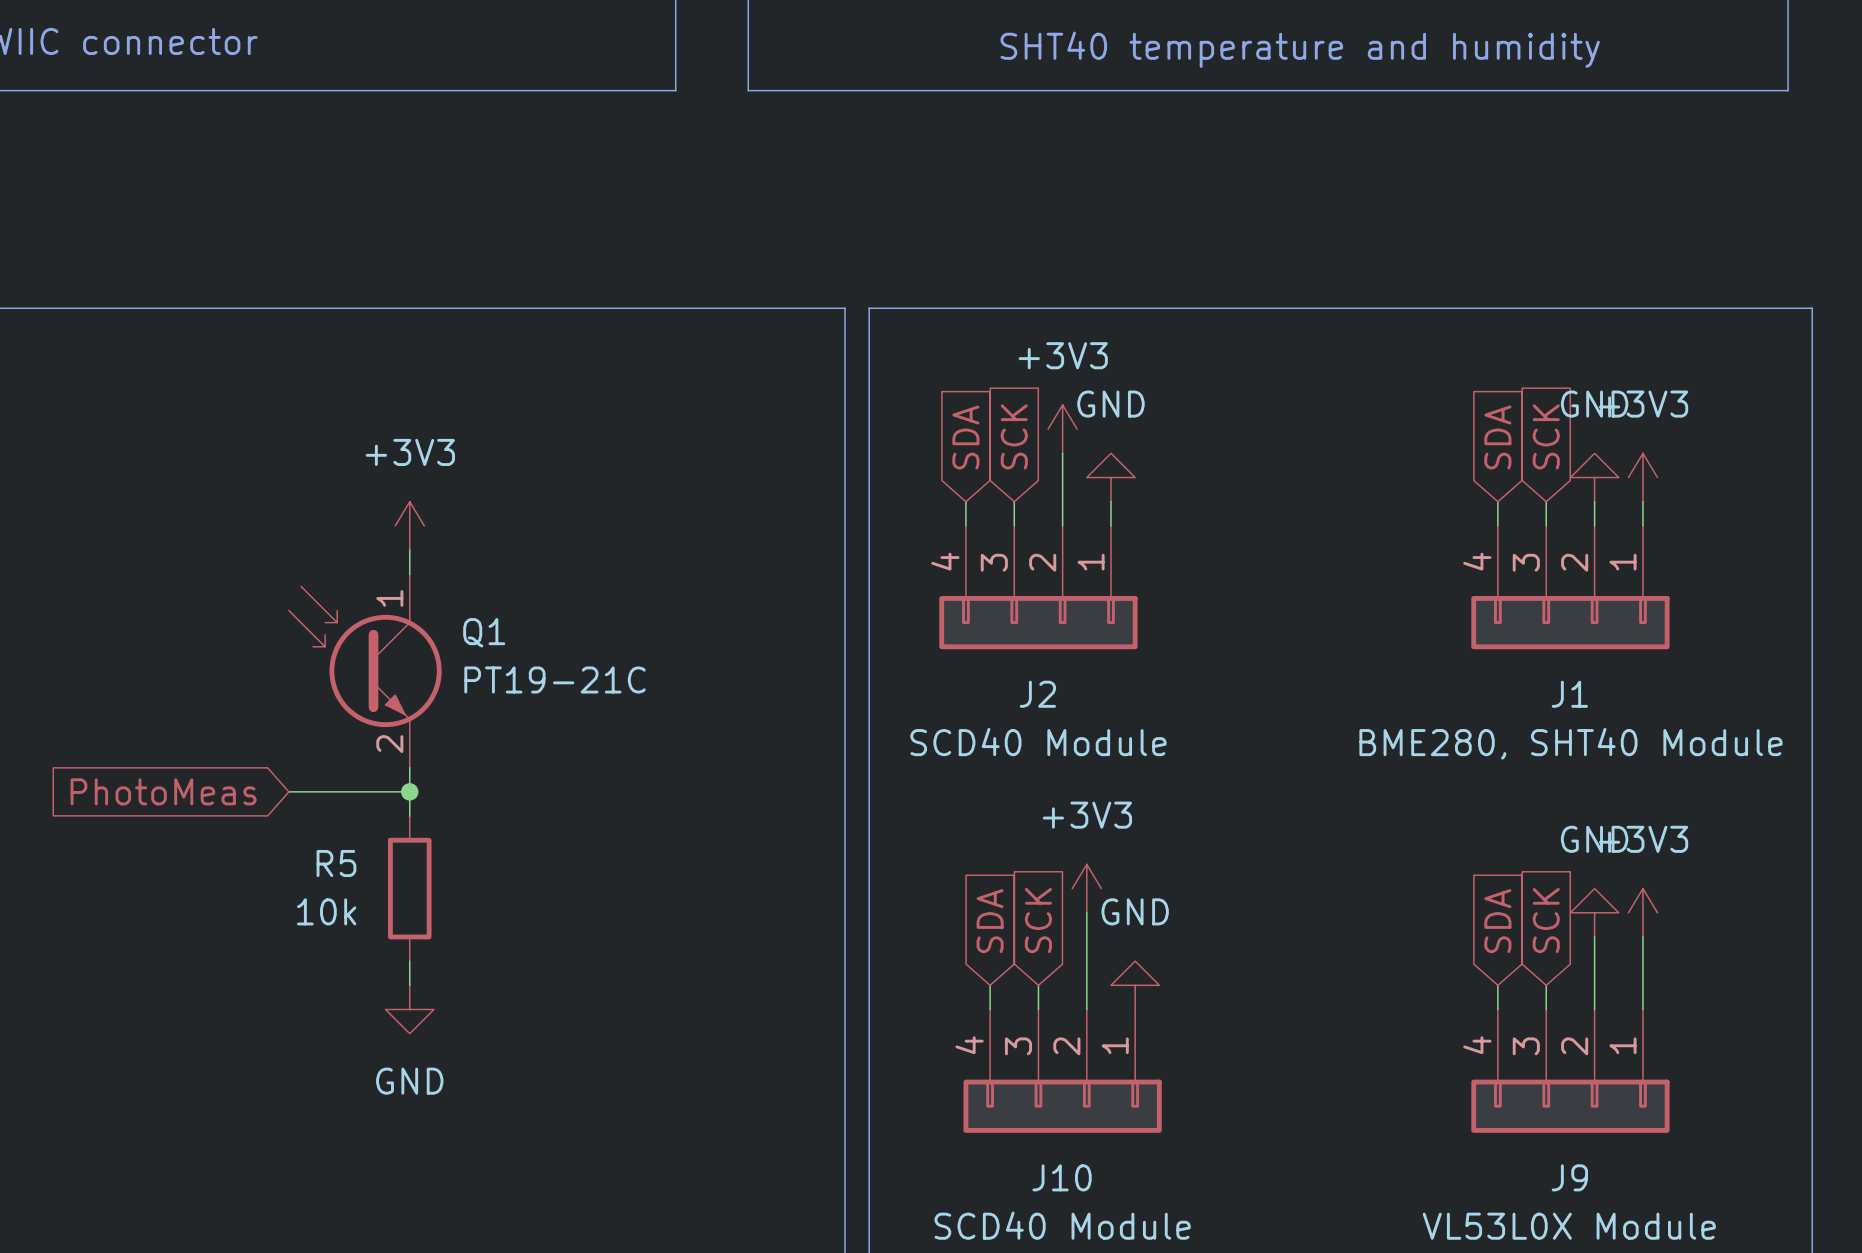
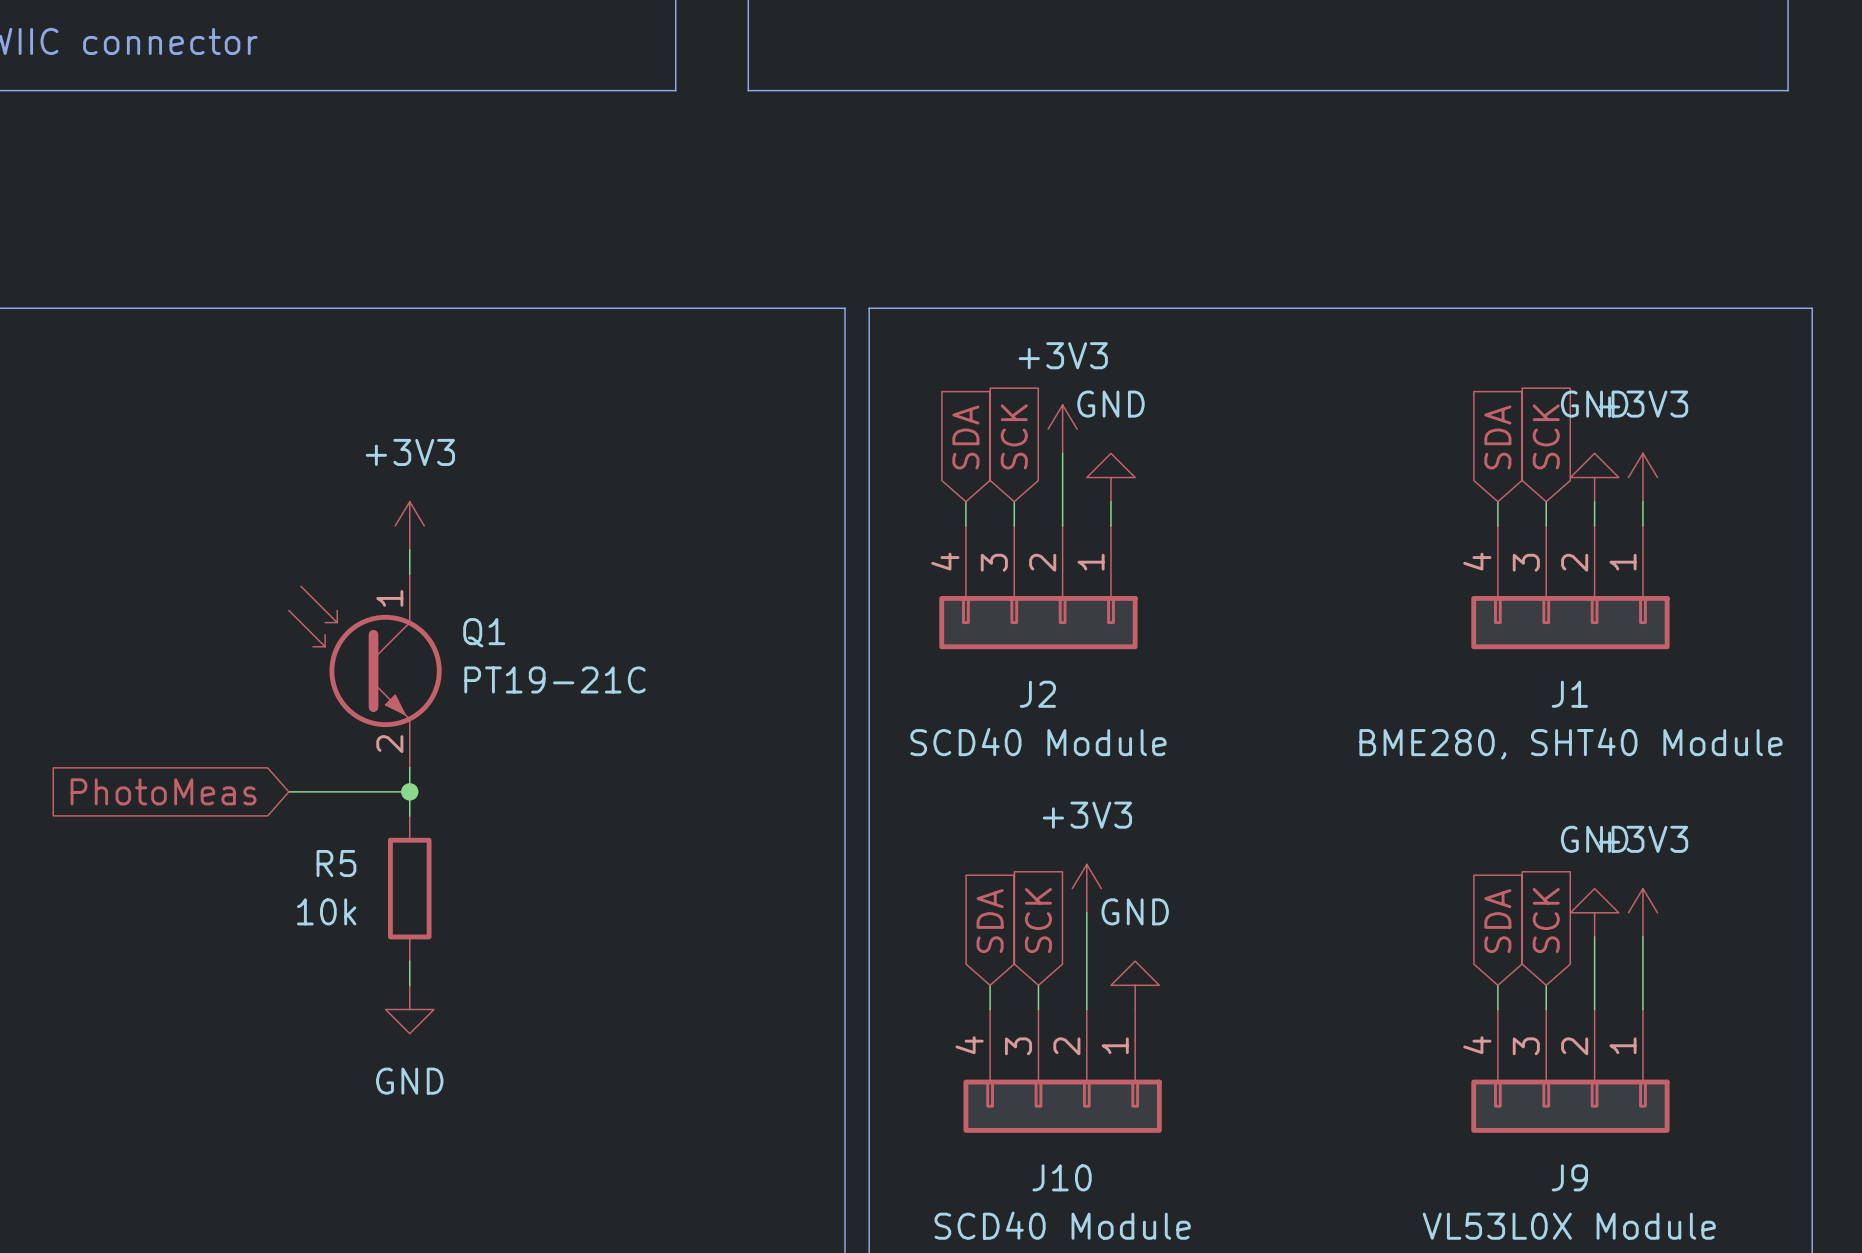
text: SHT40 temperature and humidity (1300, 49) -> none

